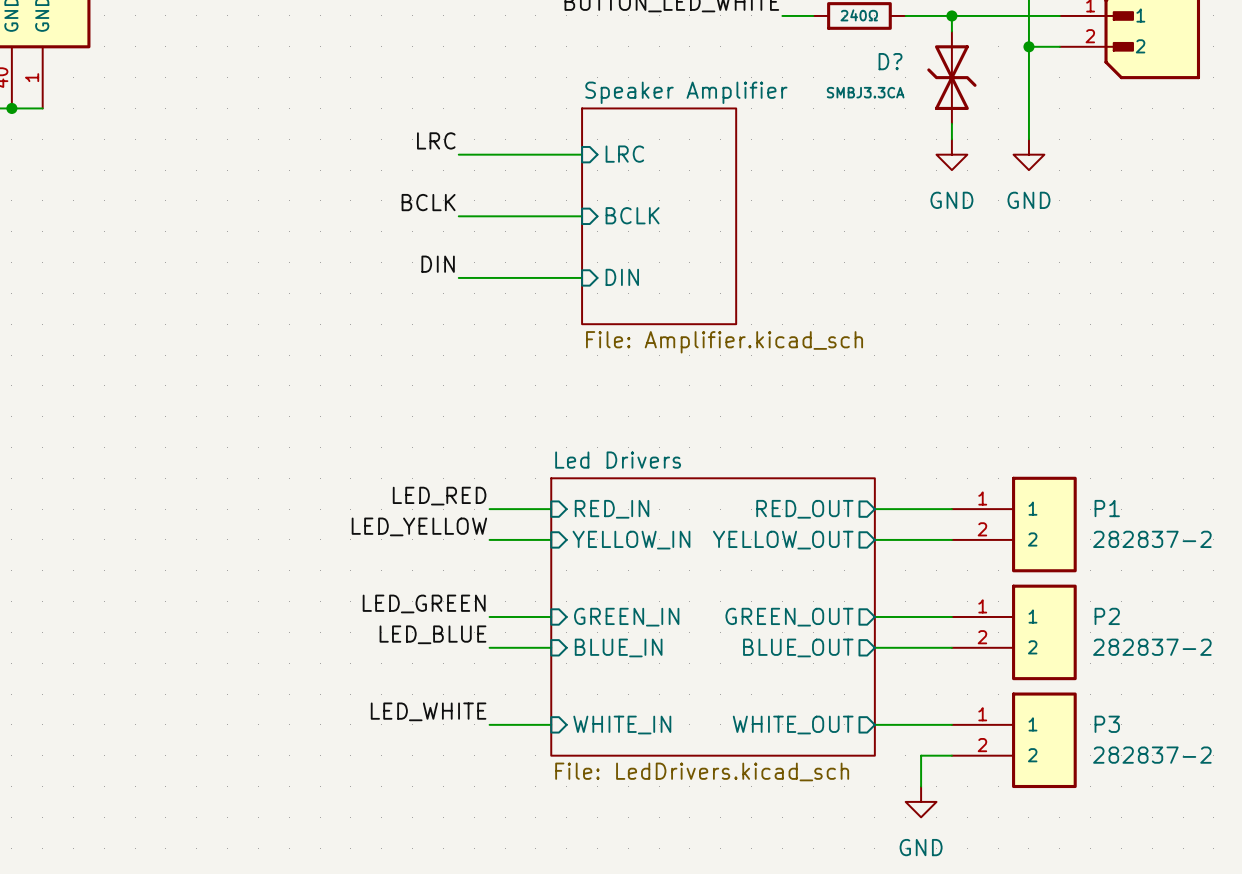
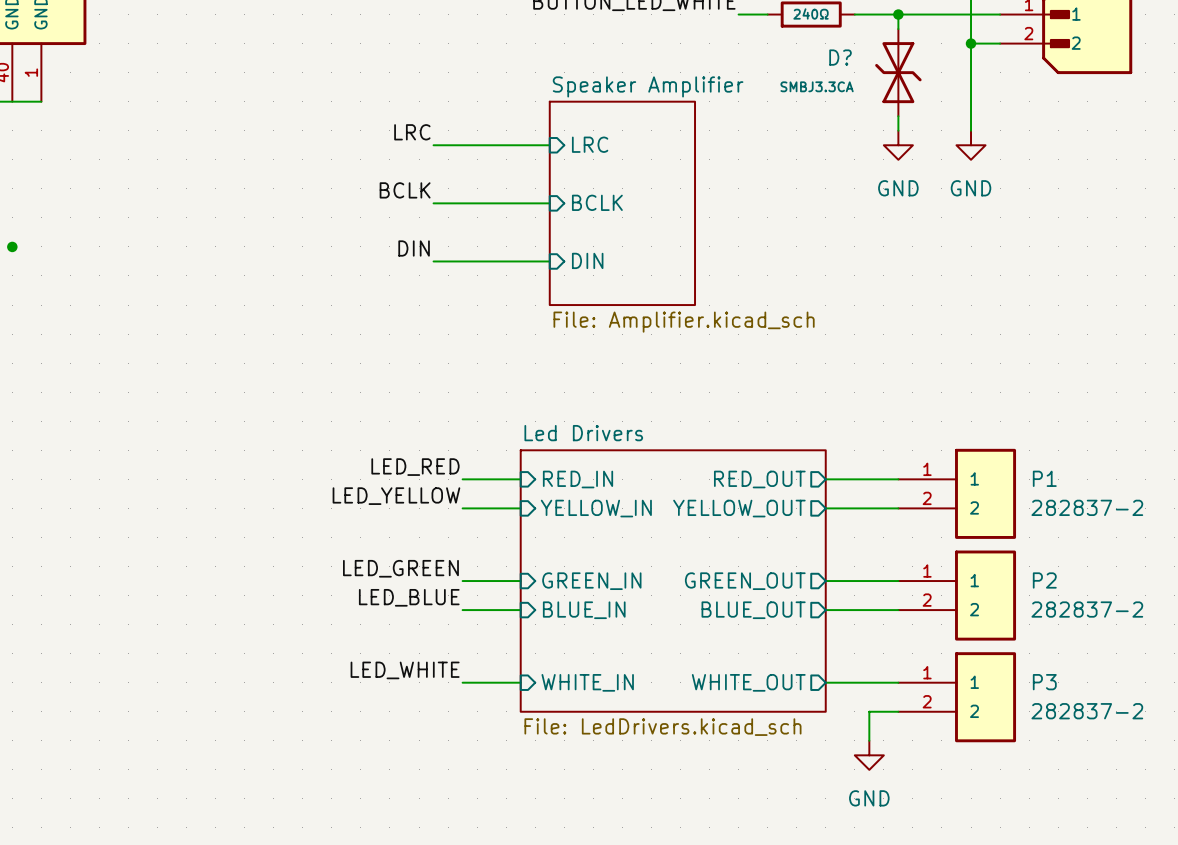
junction: (11, 108) -> none
junction: none -> (12, 246)

